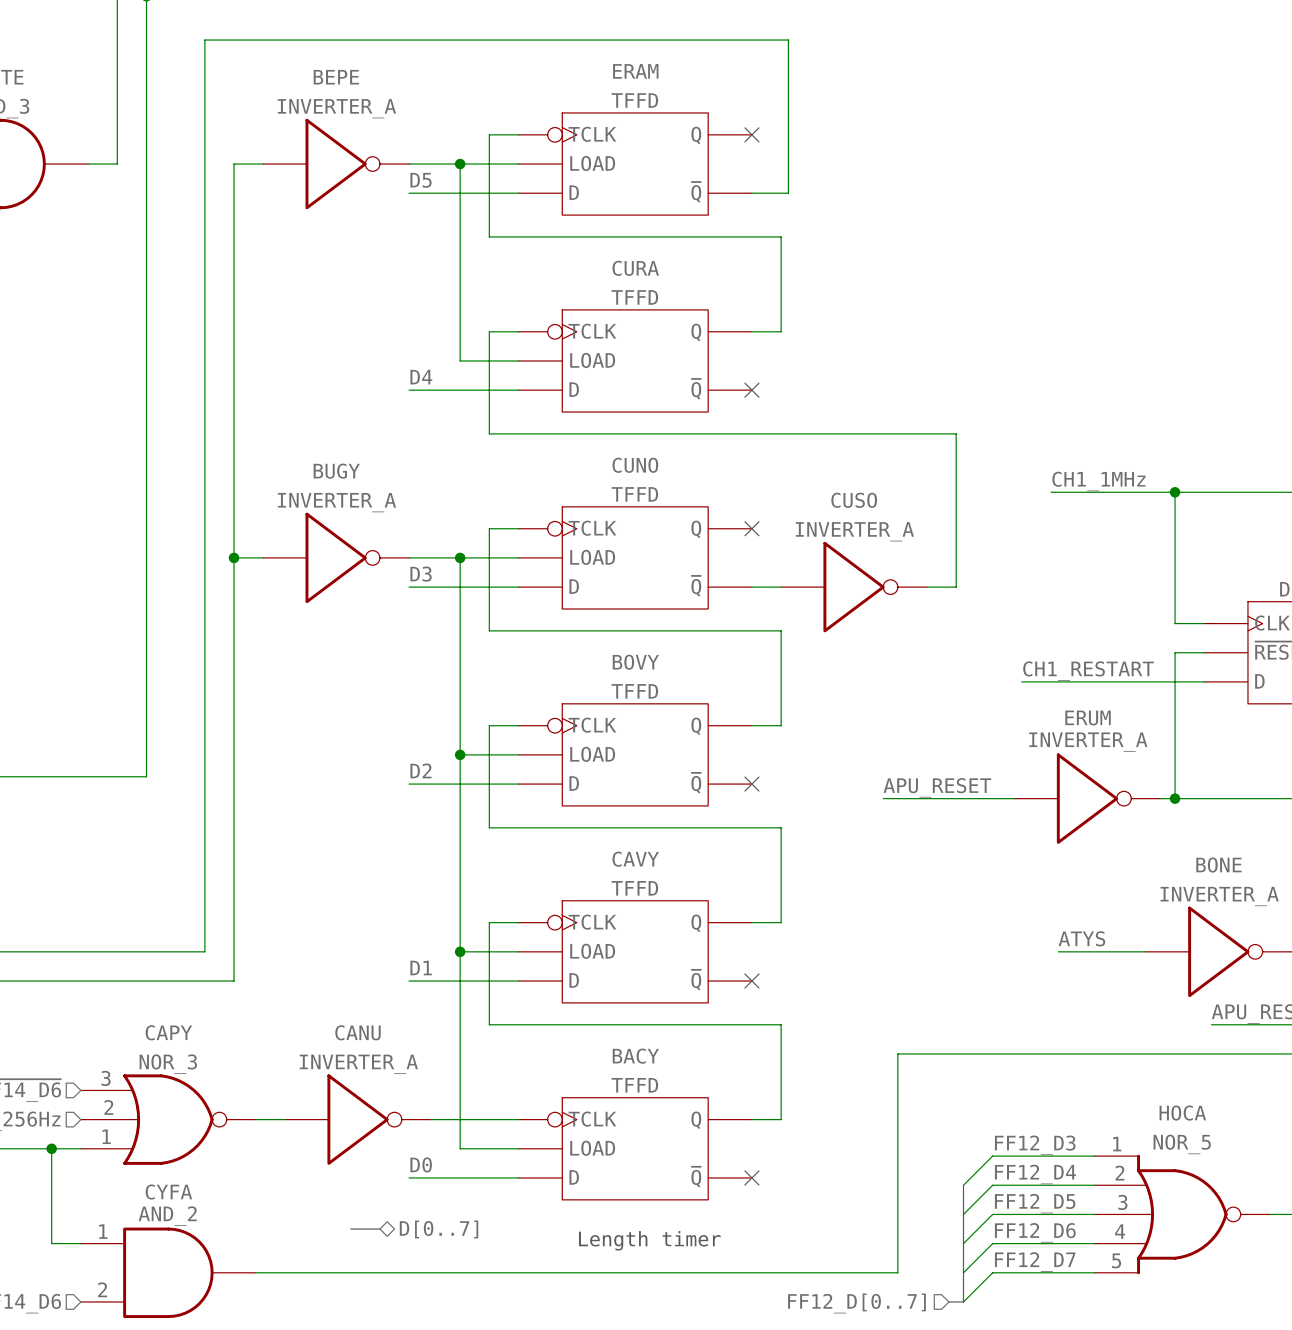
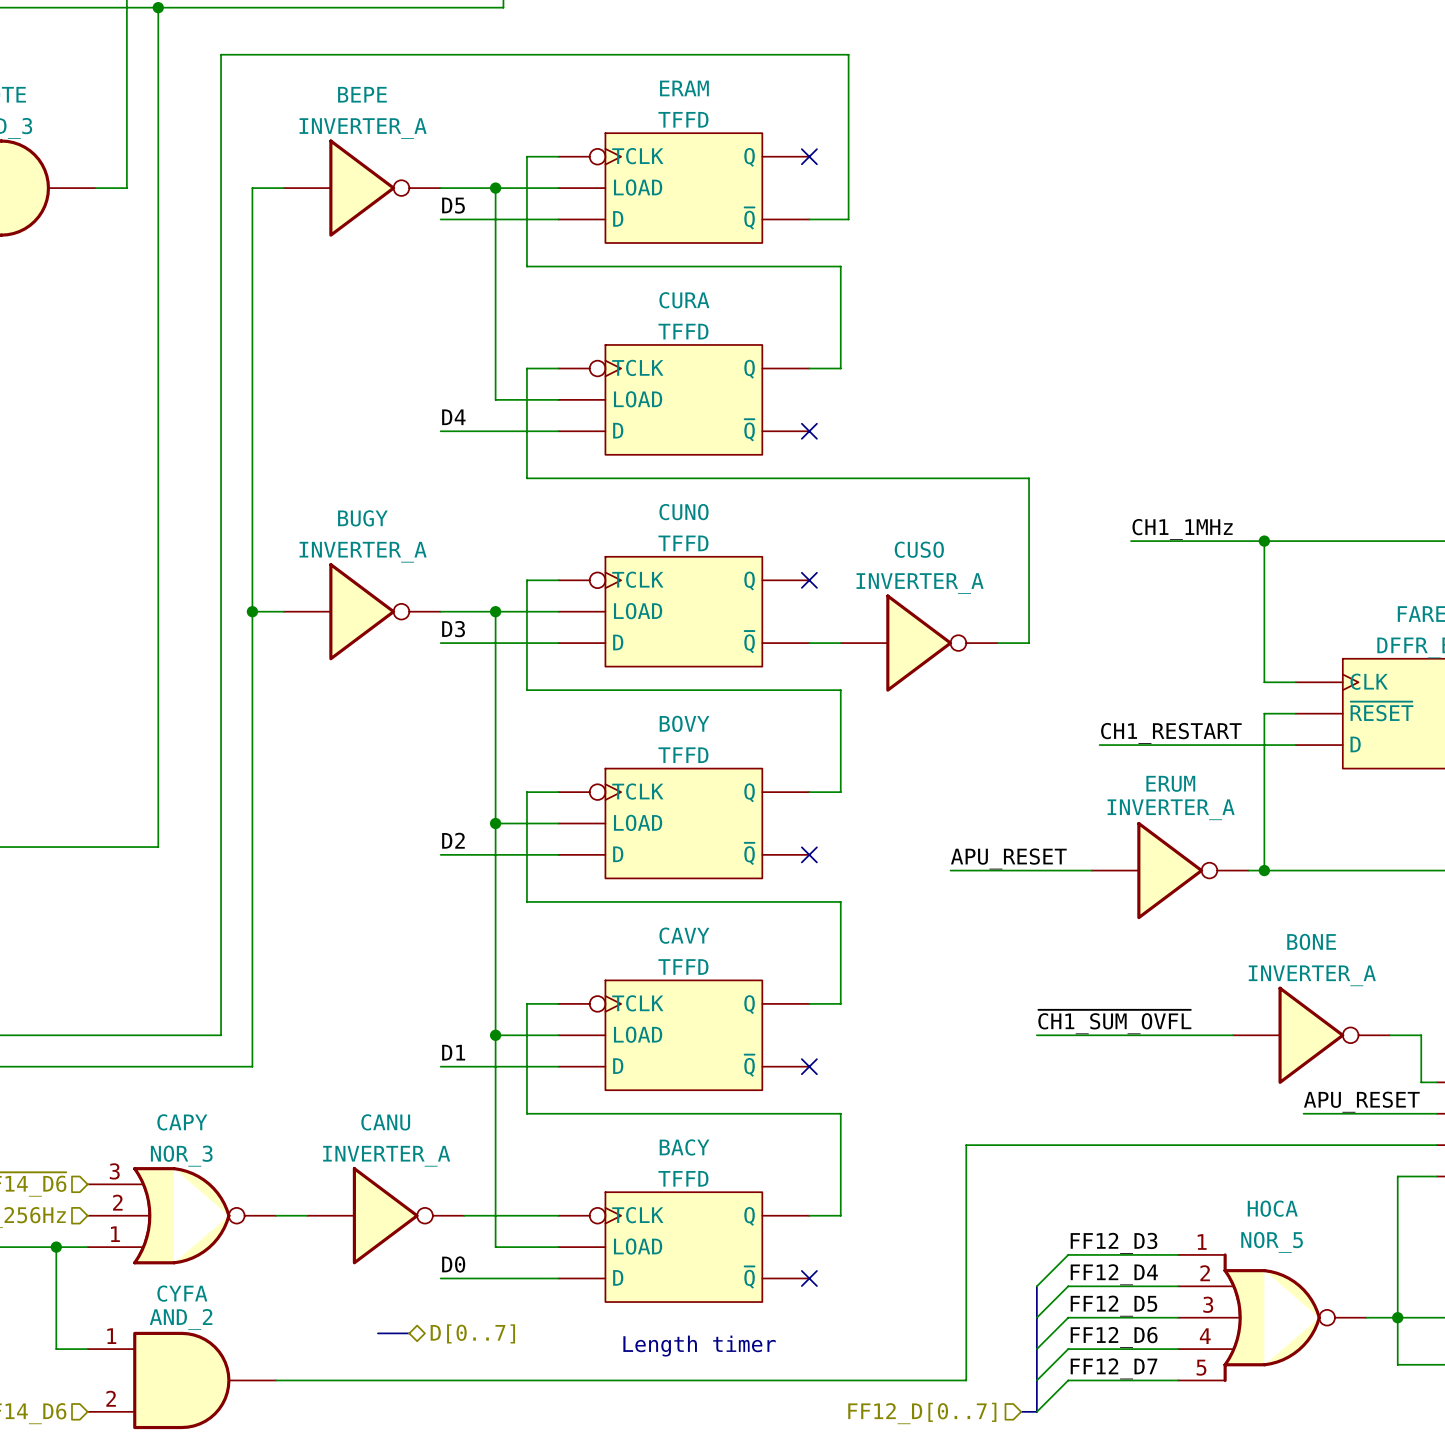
label: ATYS (1081, 938) -> none
label: none -> ~{CH1_SUM_OVFL} (1114, 1022)
wire: none -> (1036, 1035) (1138, 1035)

